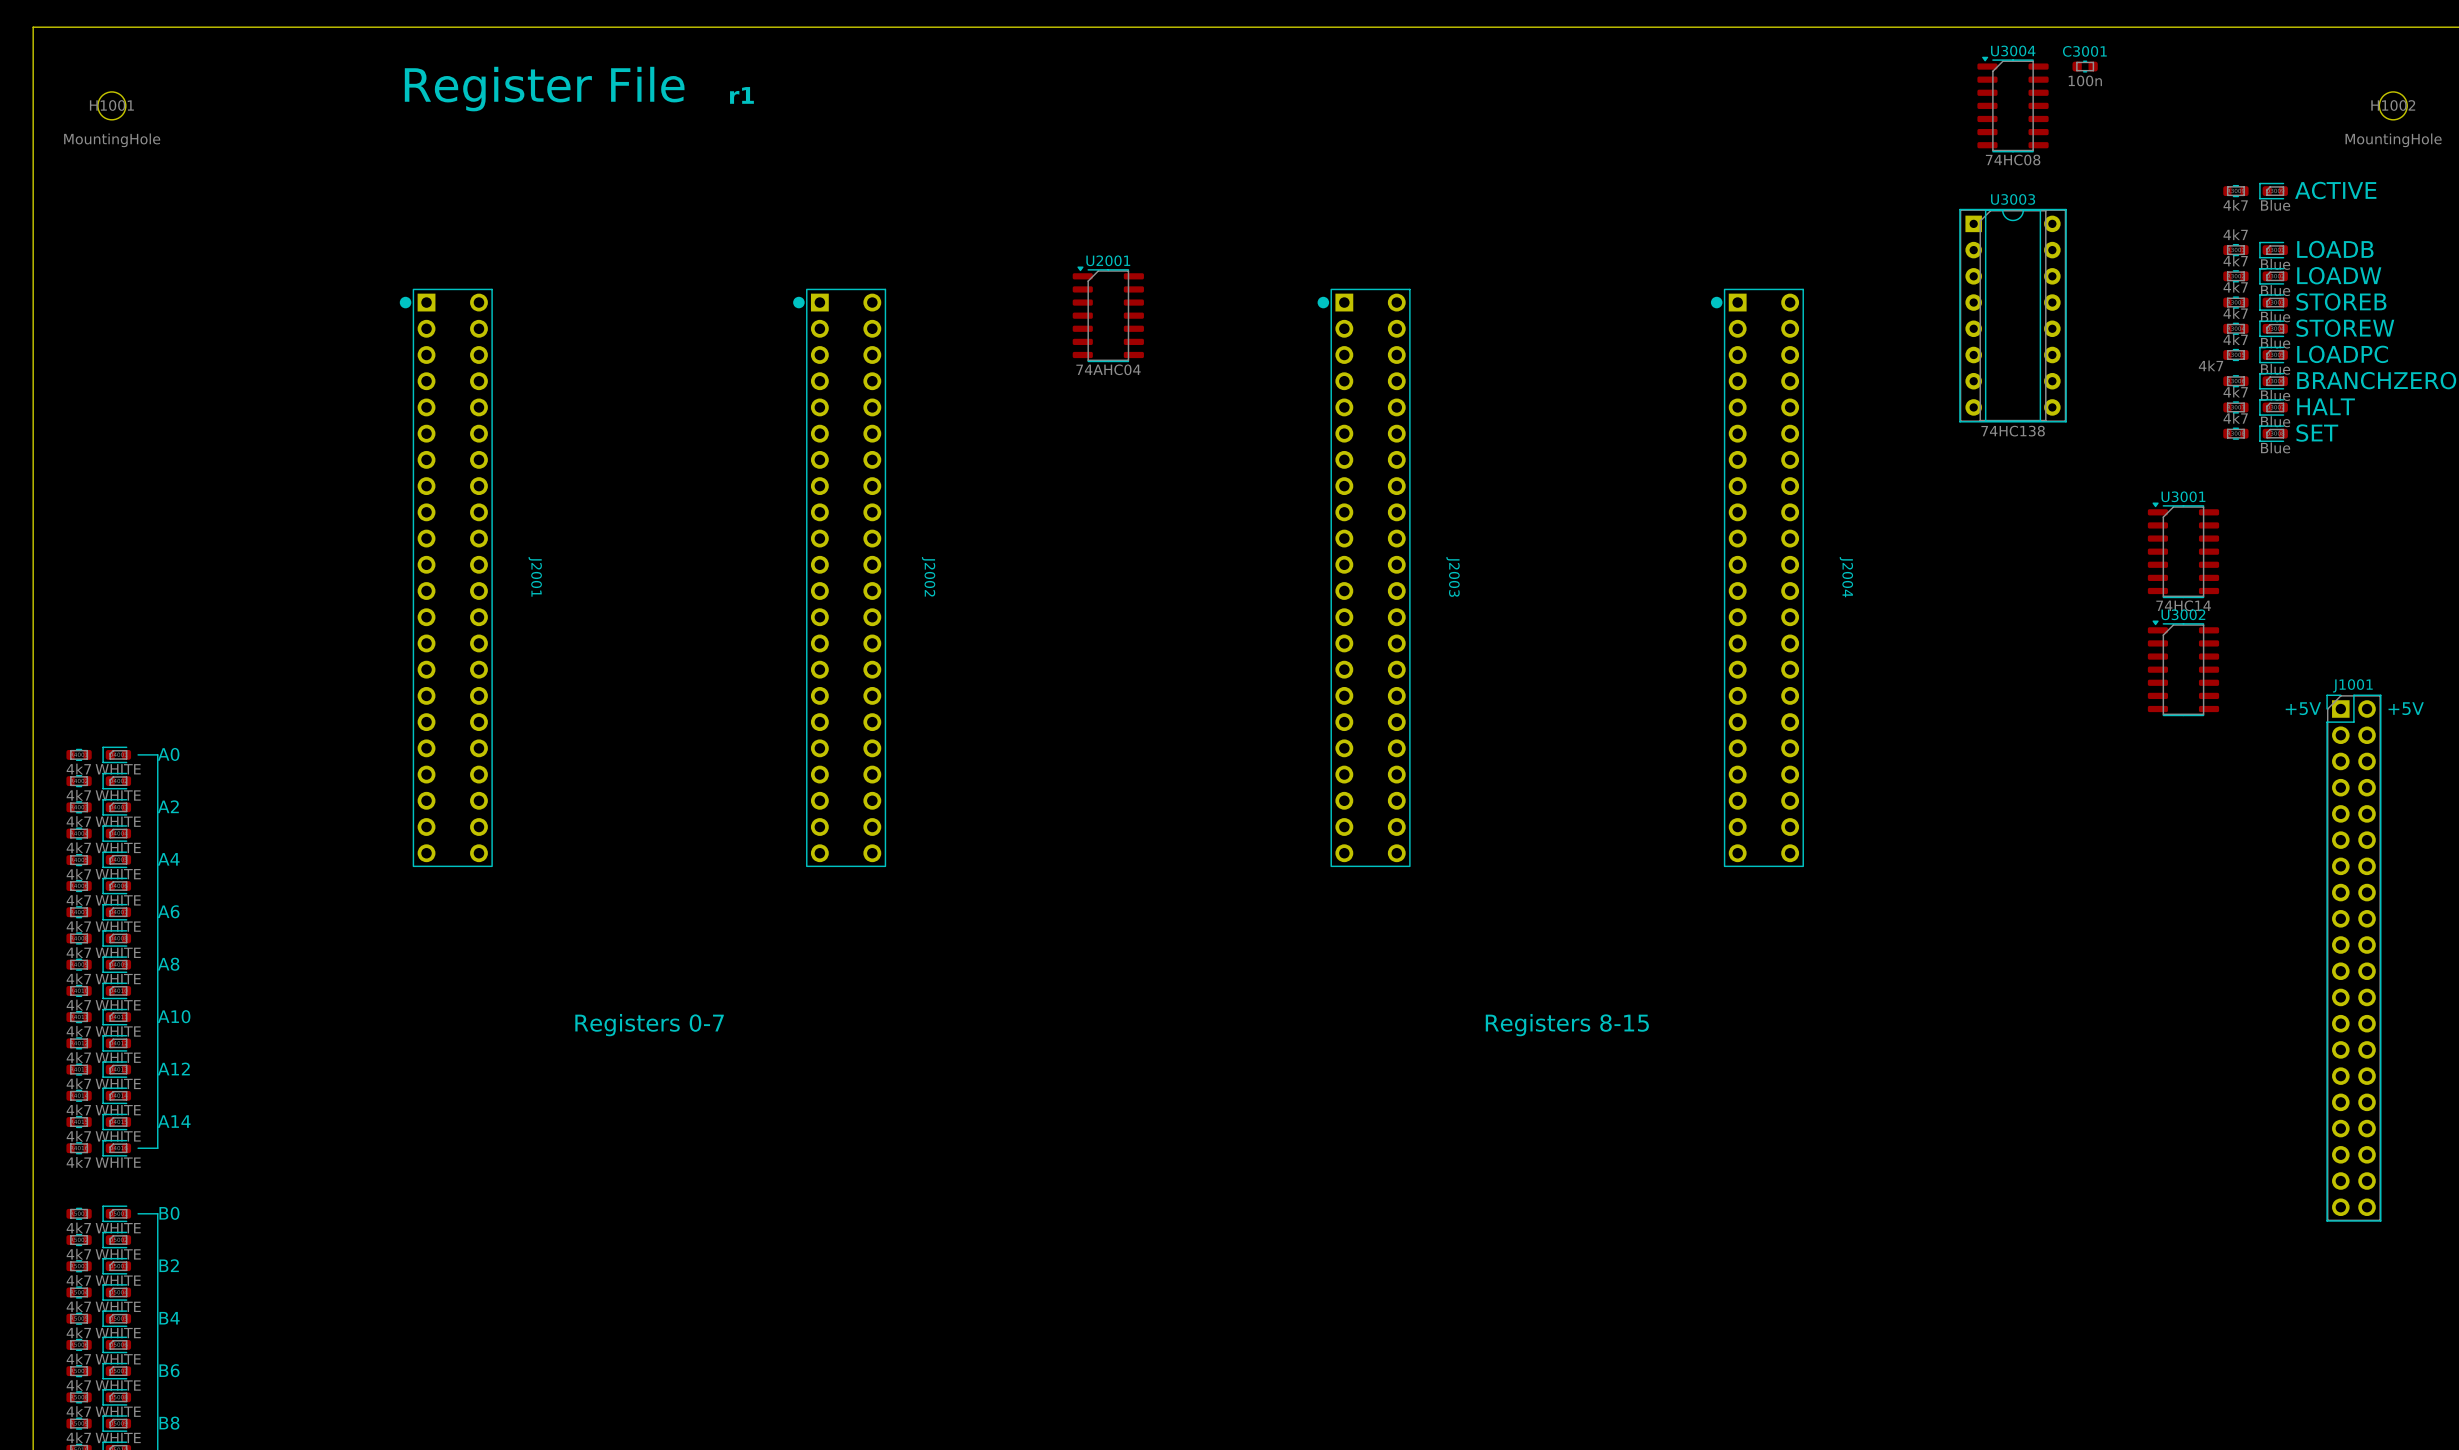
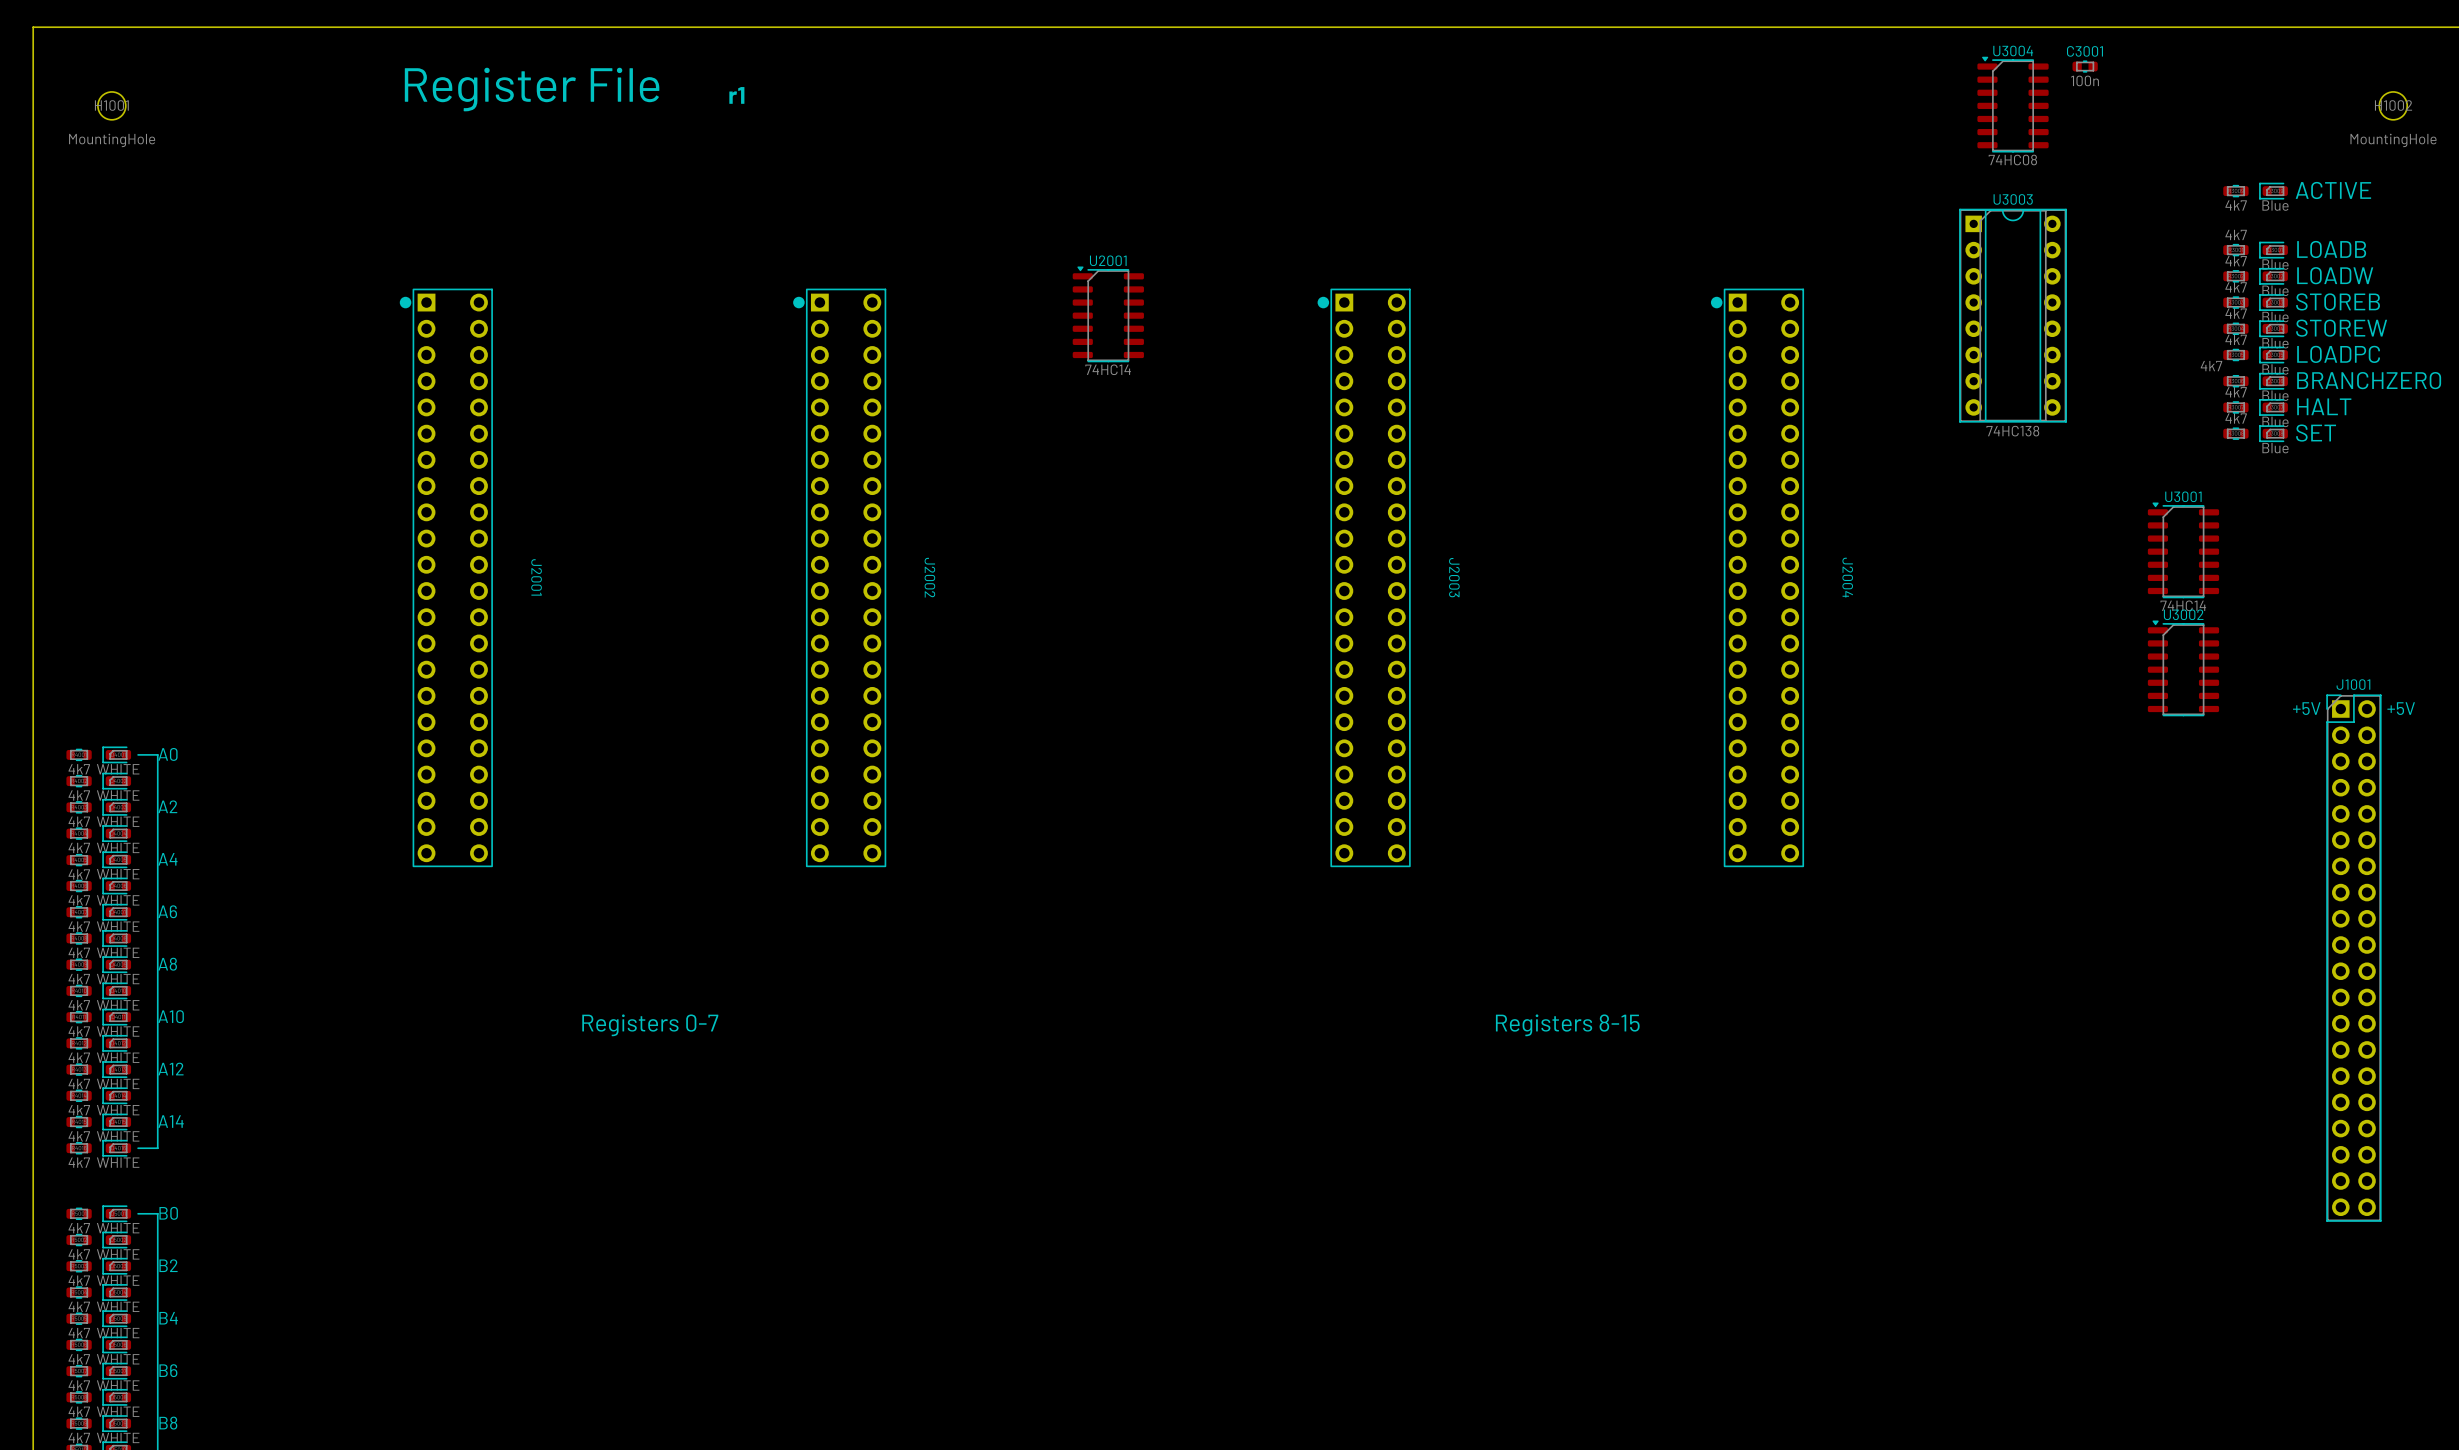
U2001 value: 74AHC04 (1108, 369) -> 74HC14 (1108, 369)

